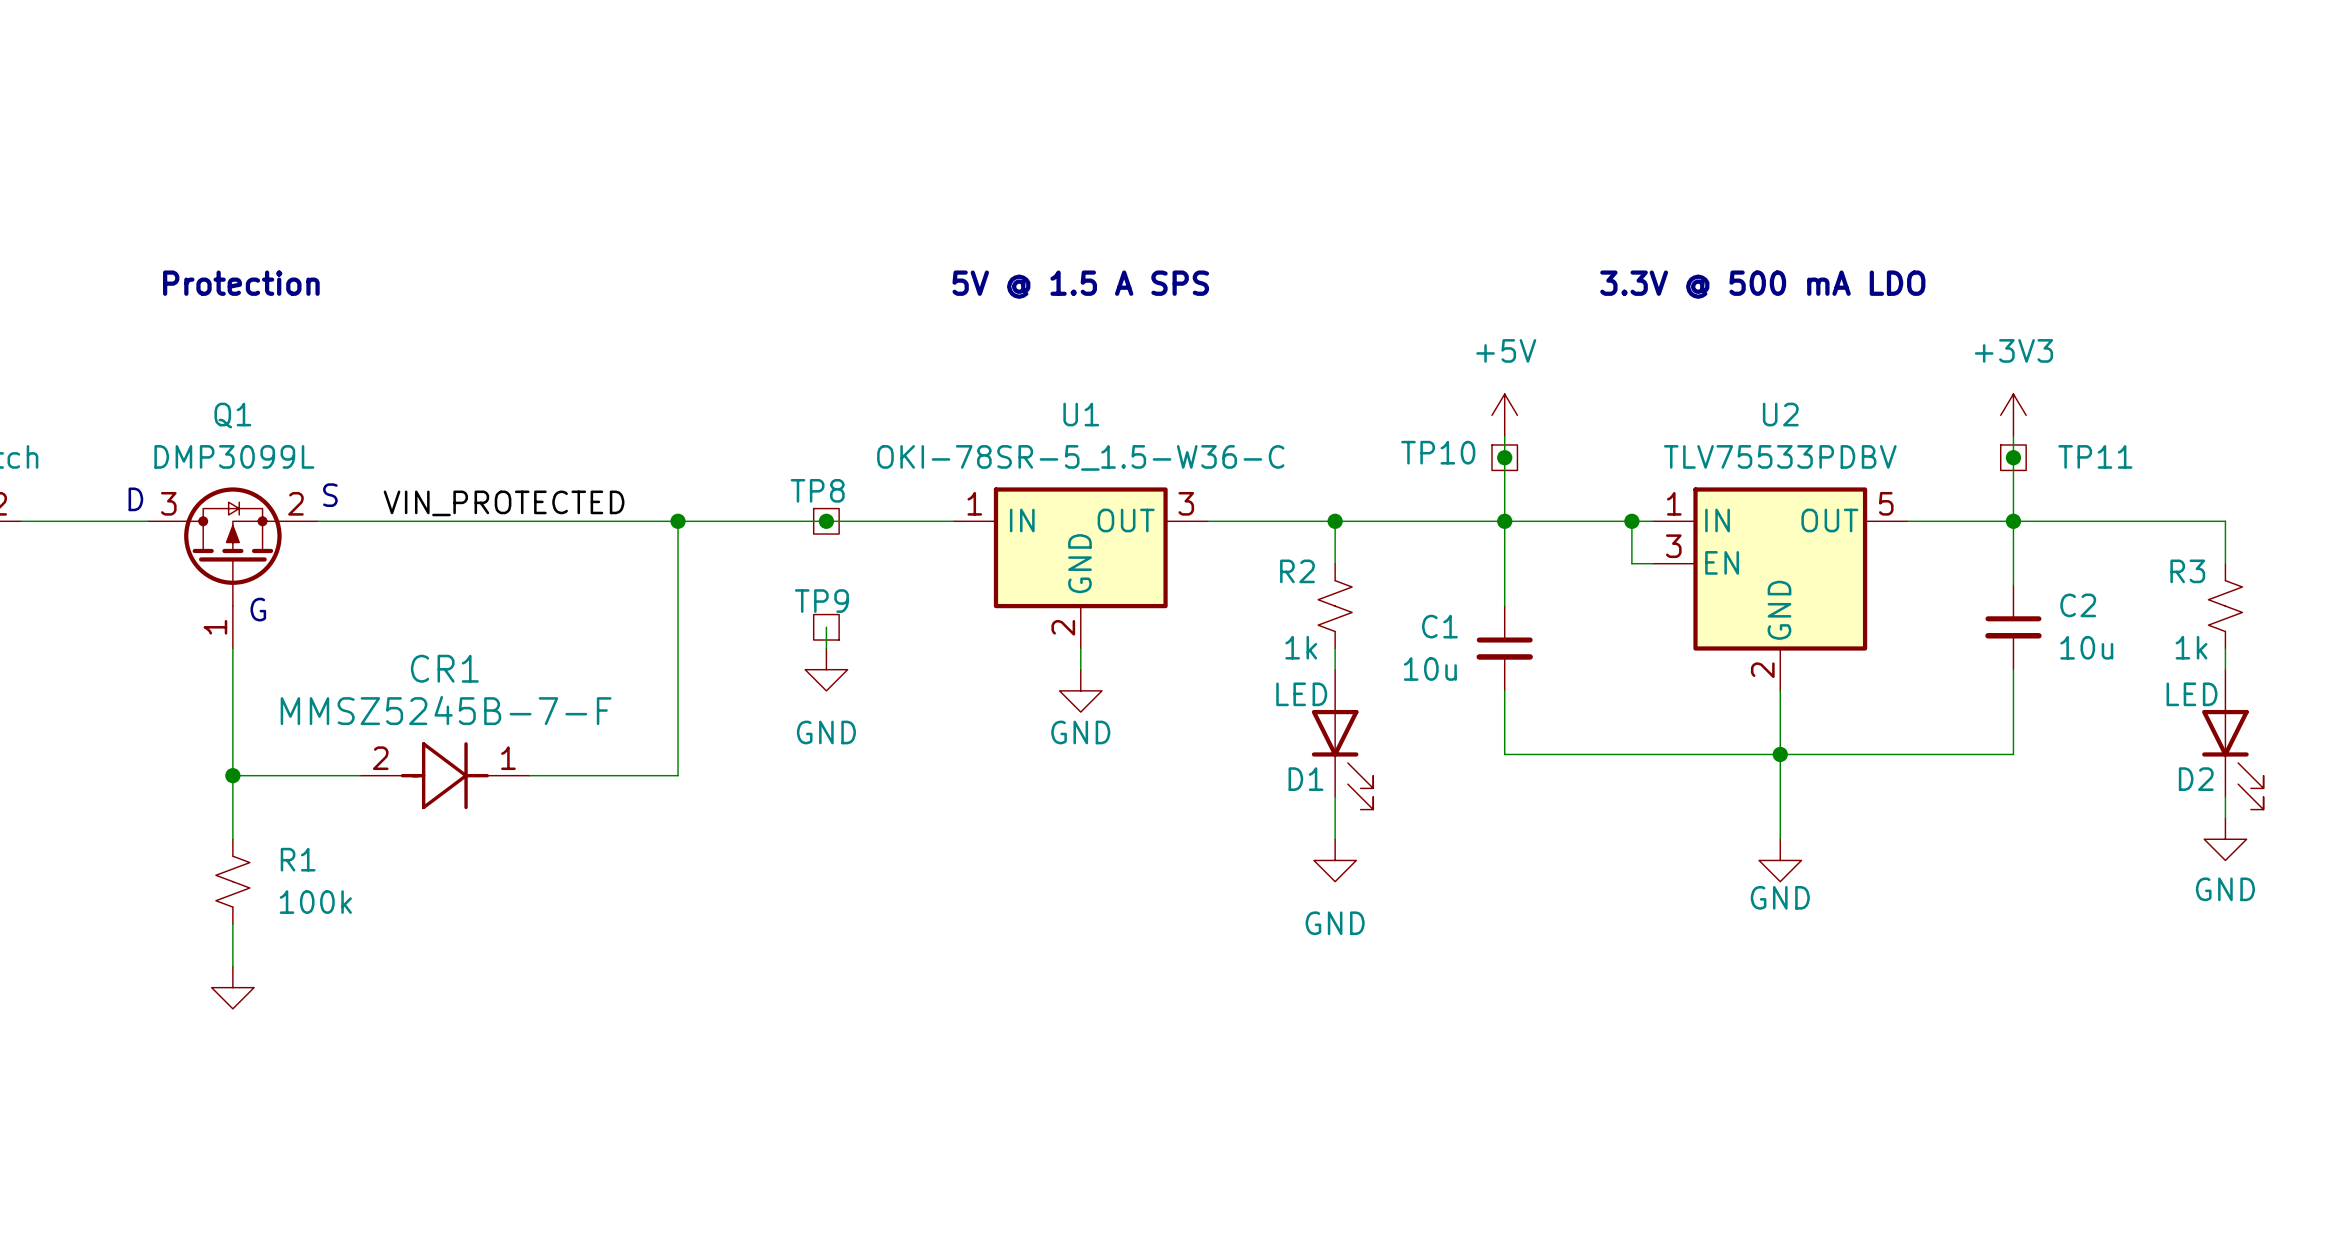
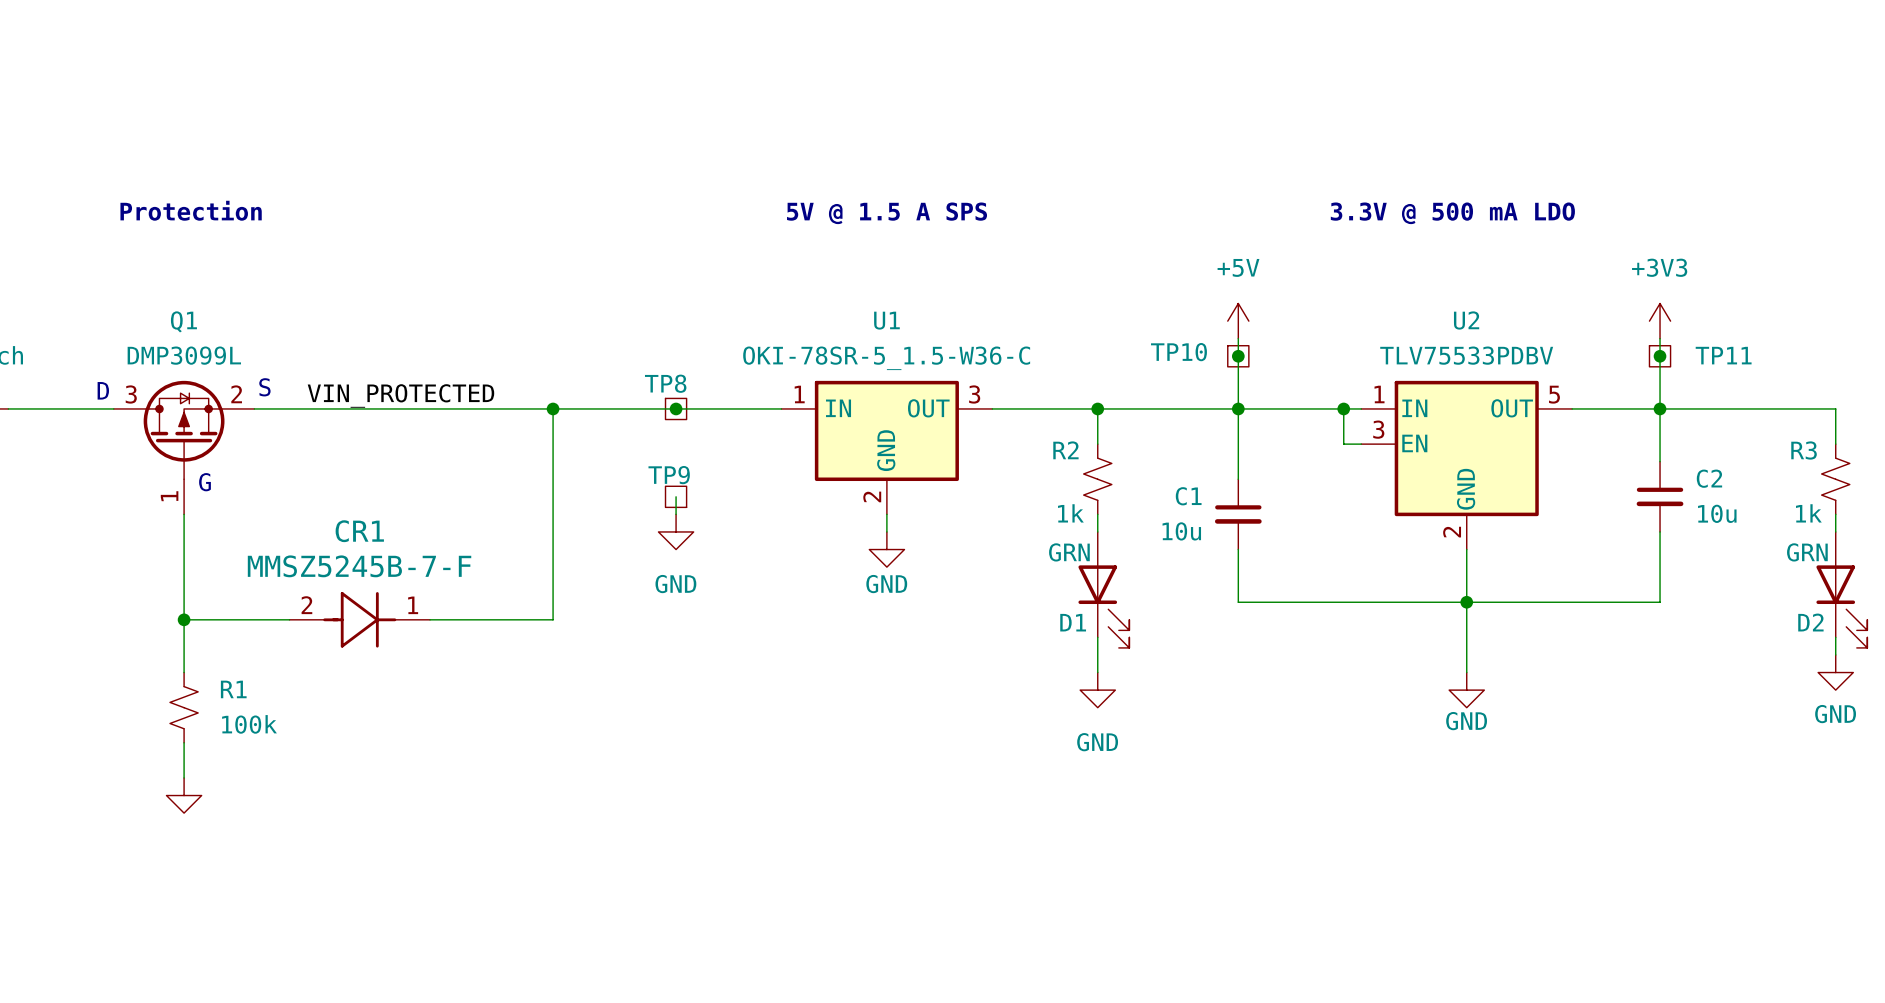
D1 value: LED (1301, 694) -> GRN (1069, 552)
D2 value: LED (2192, 694) -> GRN (1807, 552)

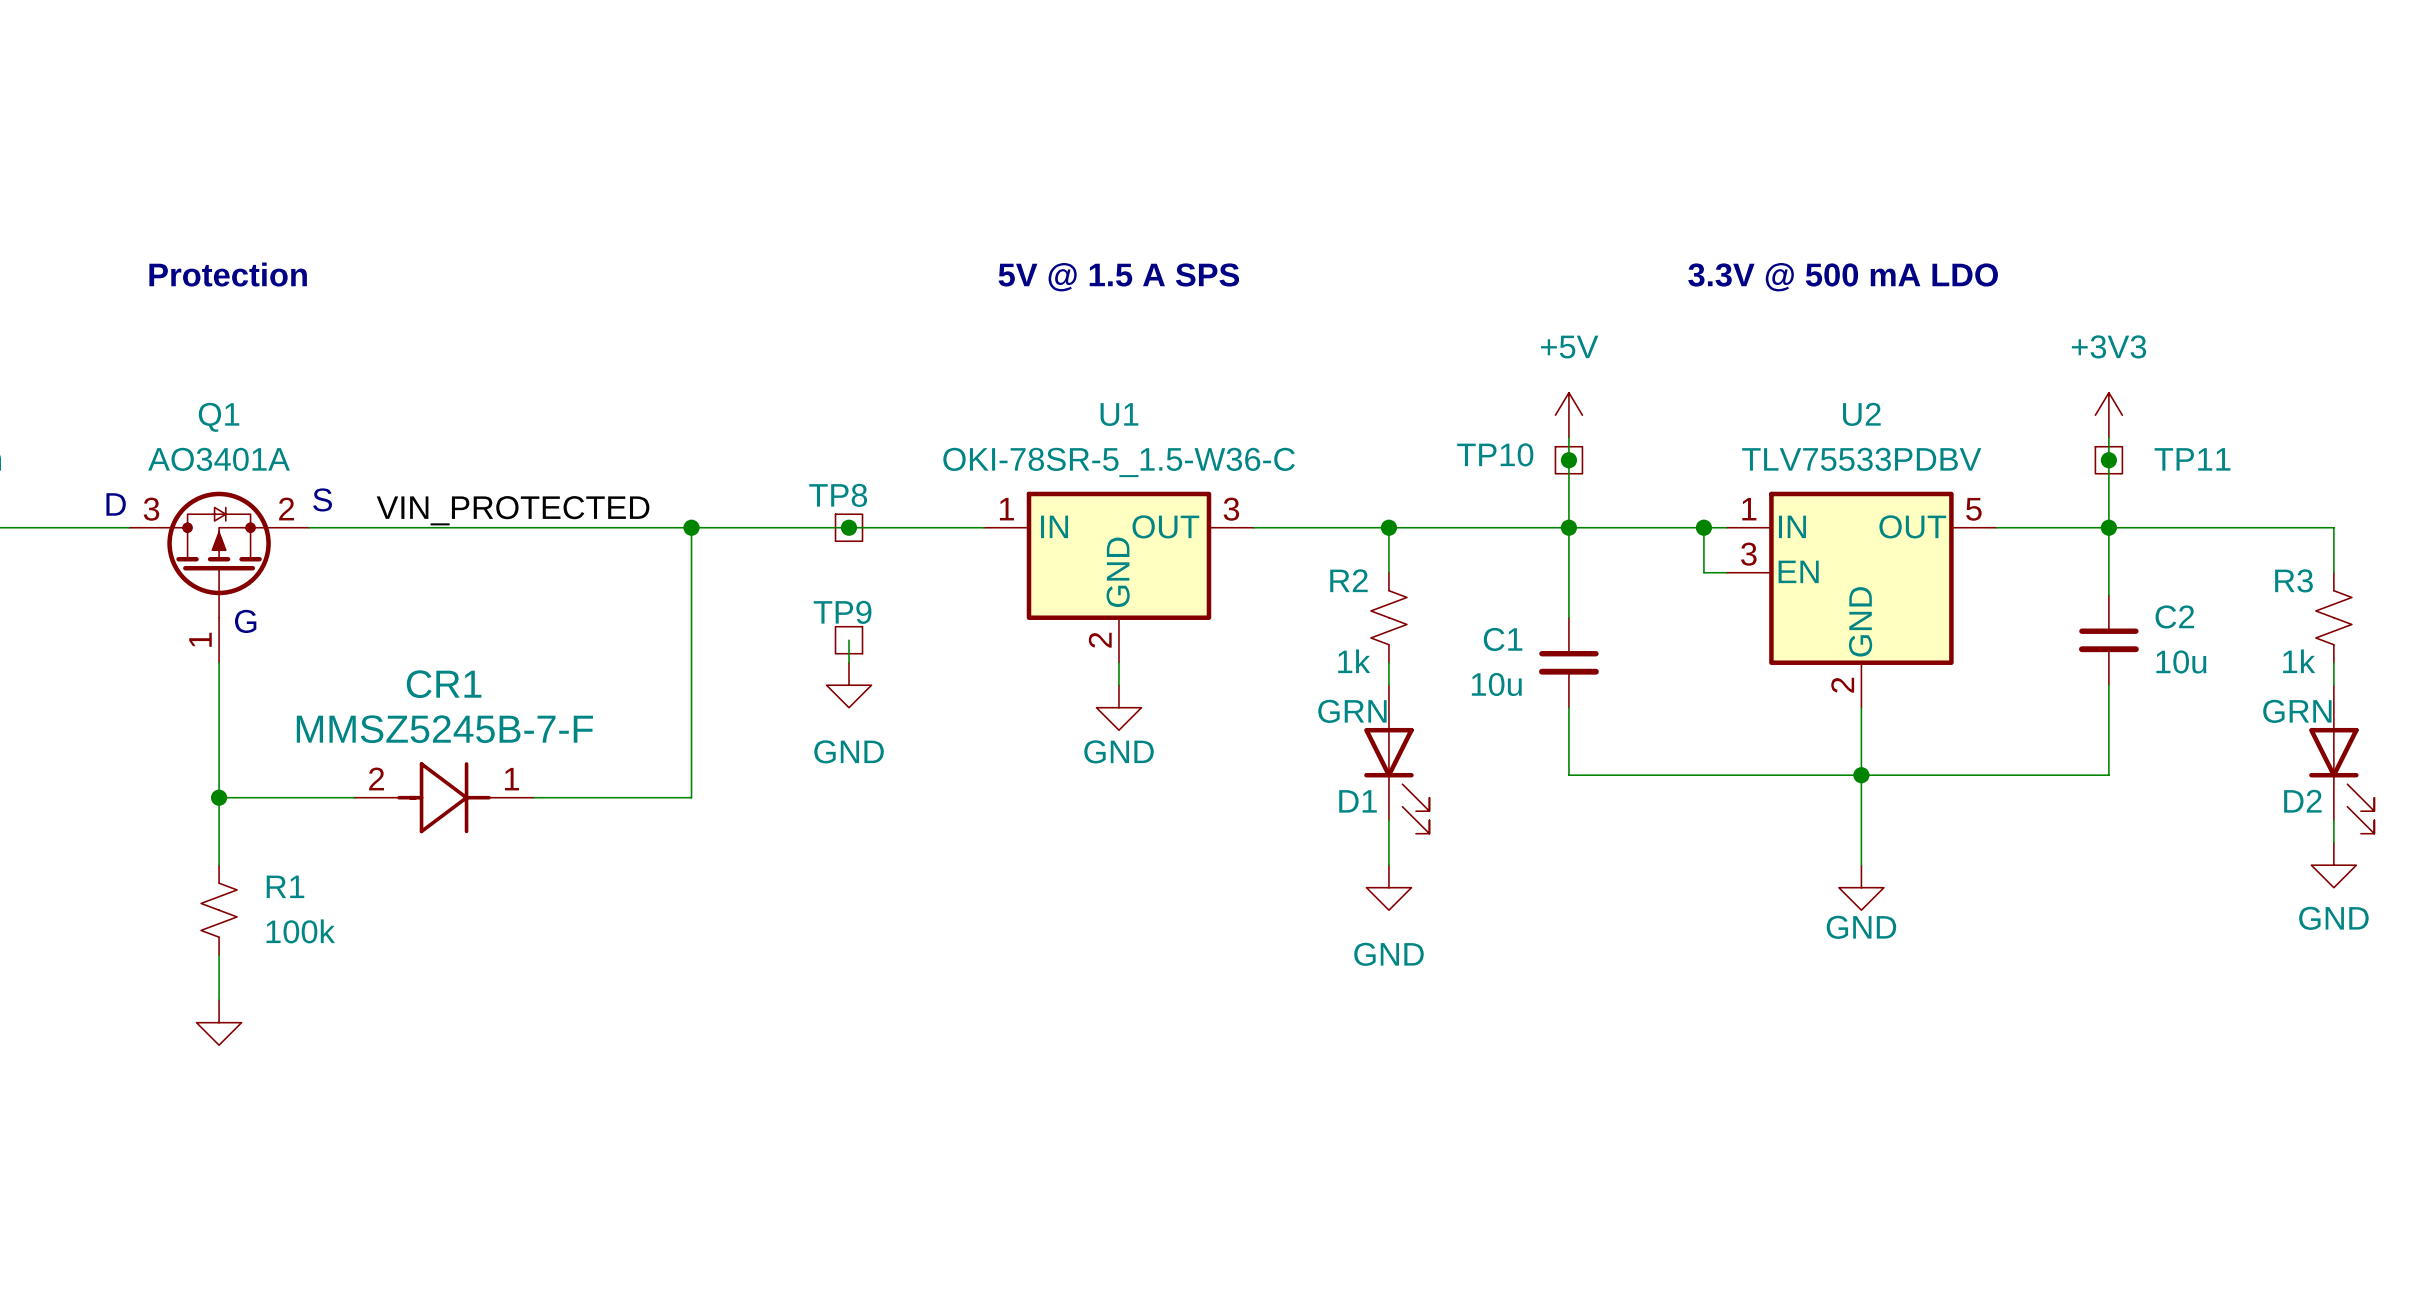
Q1 value: DMP3099L (184, 355) -> AO3401A (219, 459)

